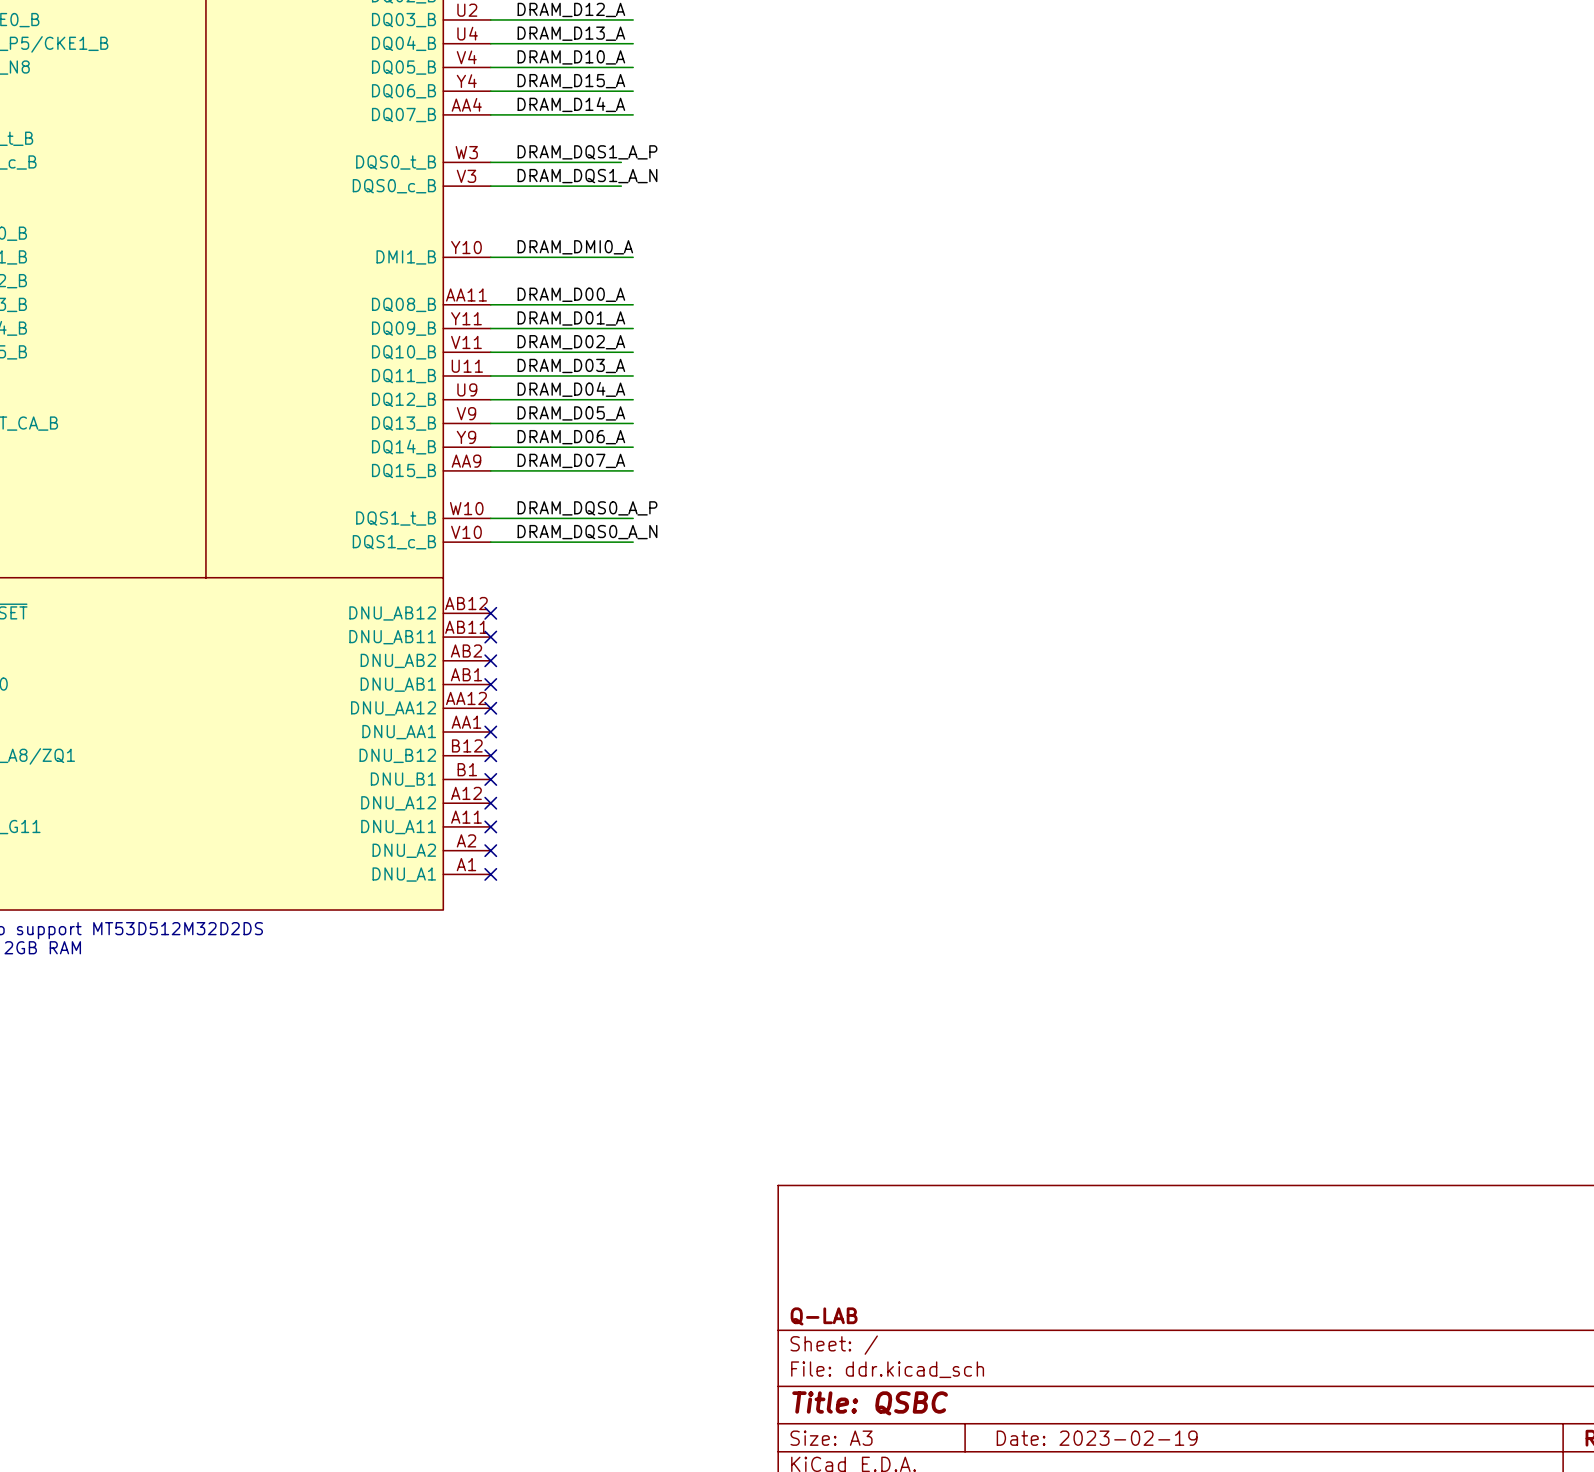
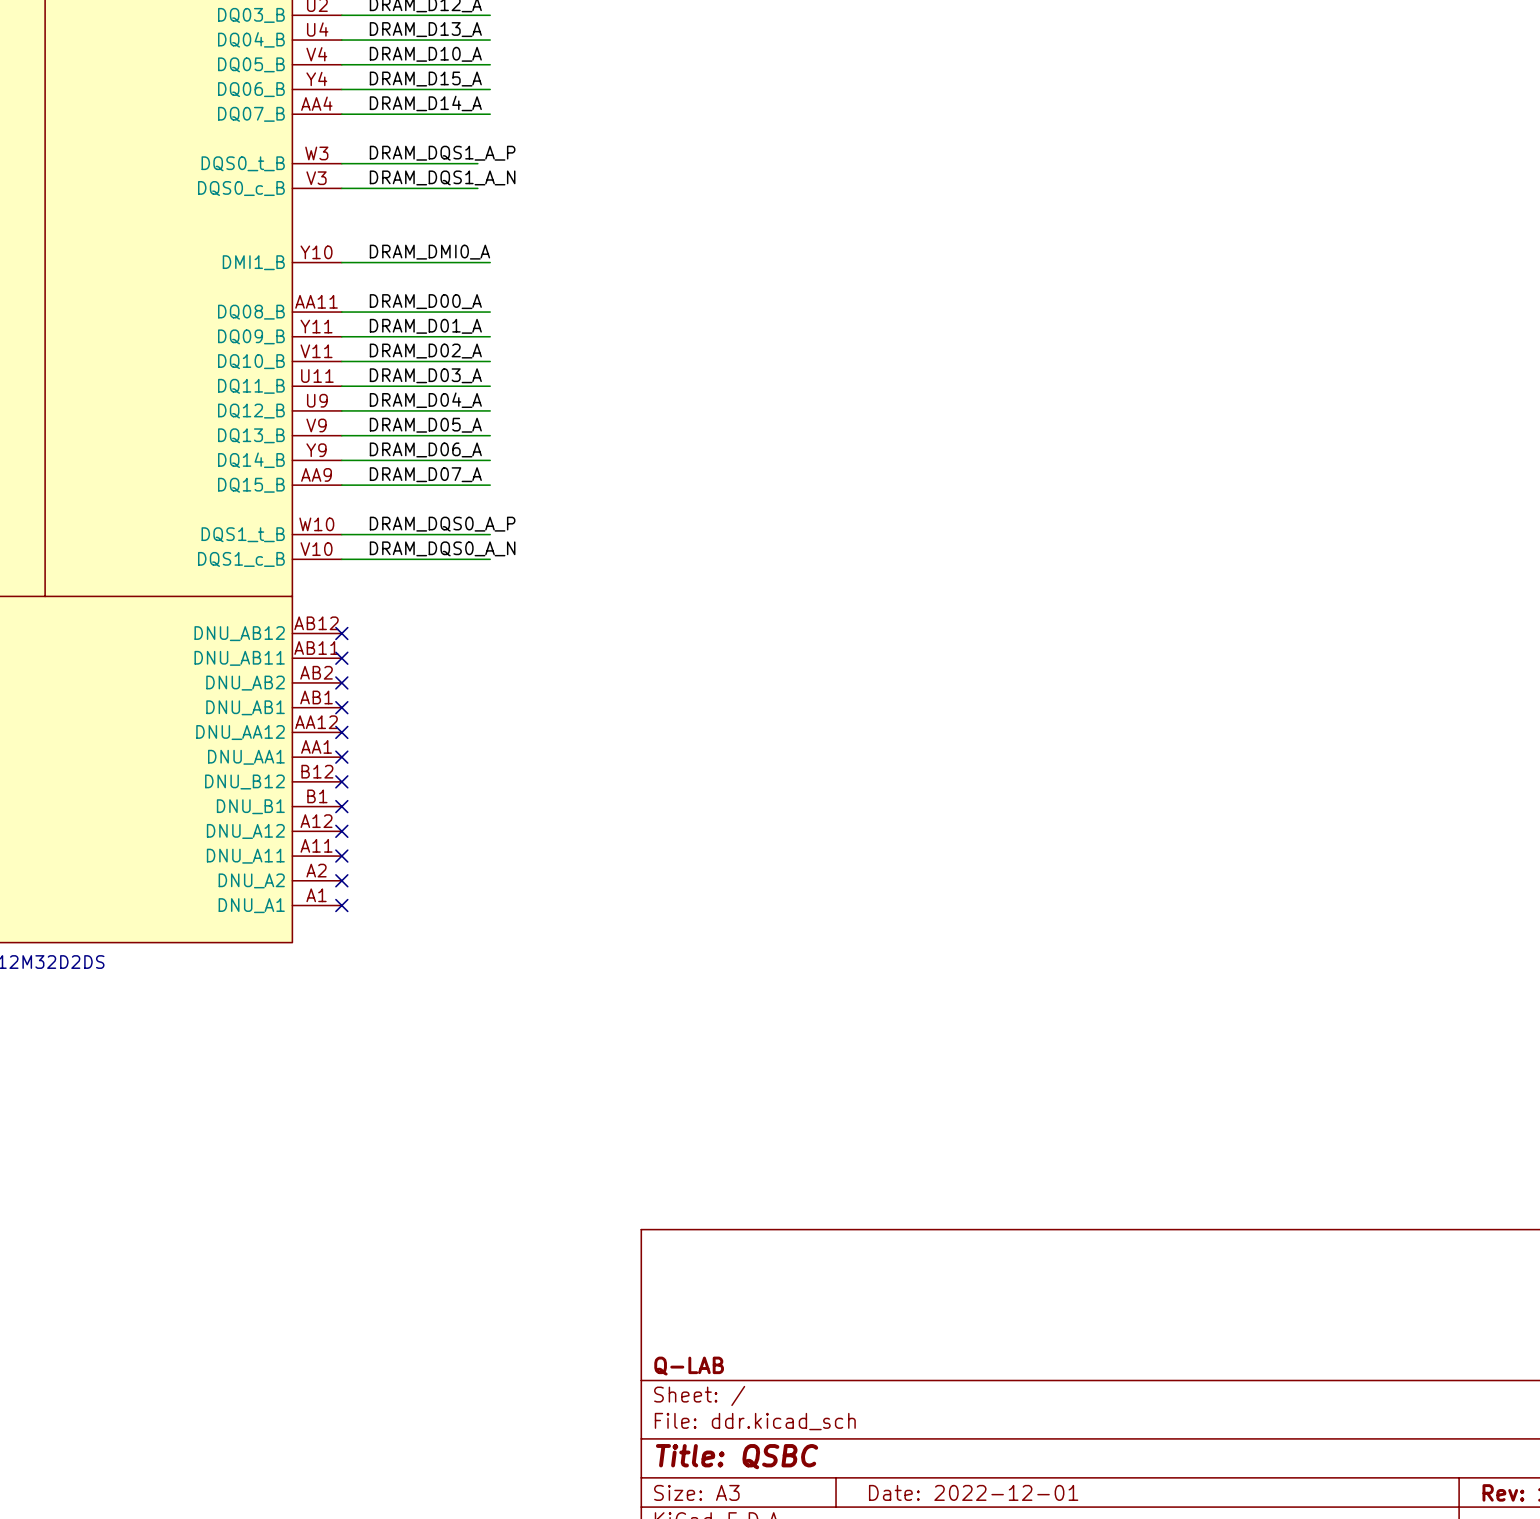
title block: Date: 2023-02-19 (1097, 1438) -> Date: 2022-12-01 (973, 1492)

